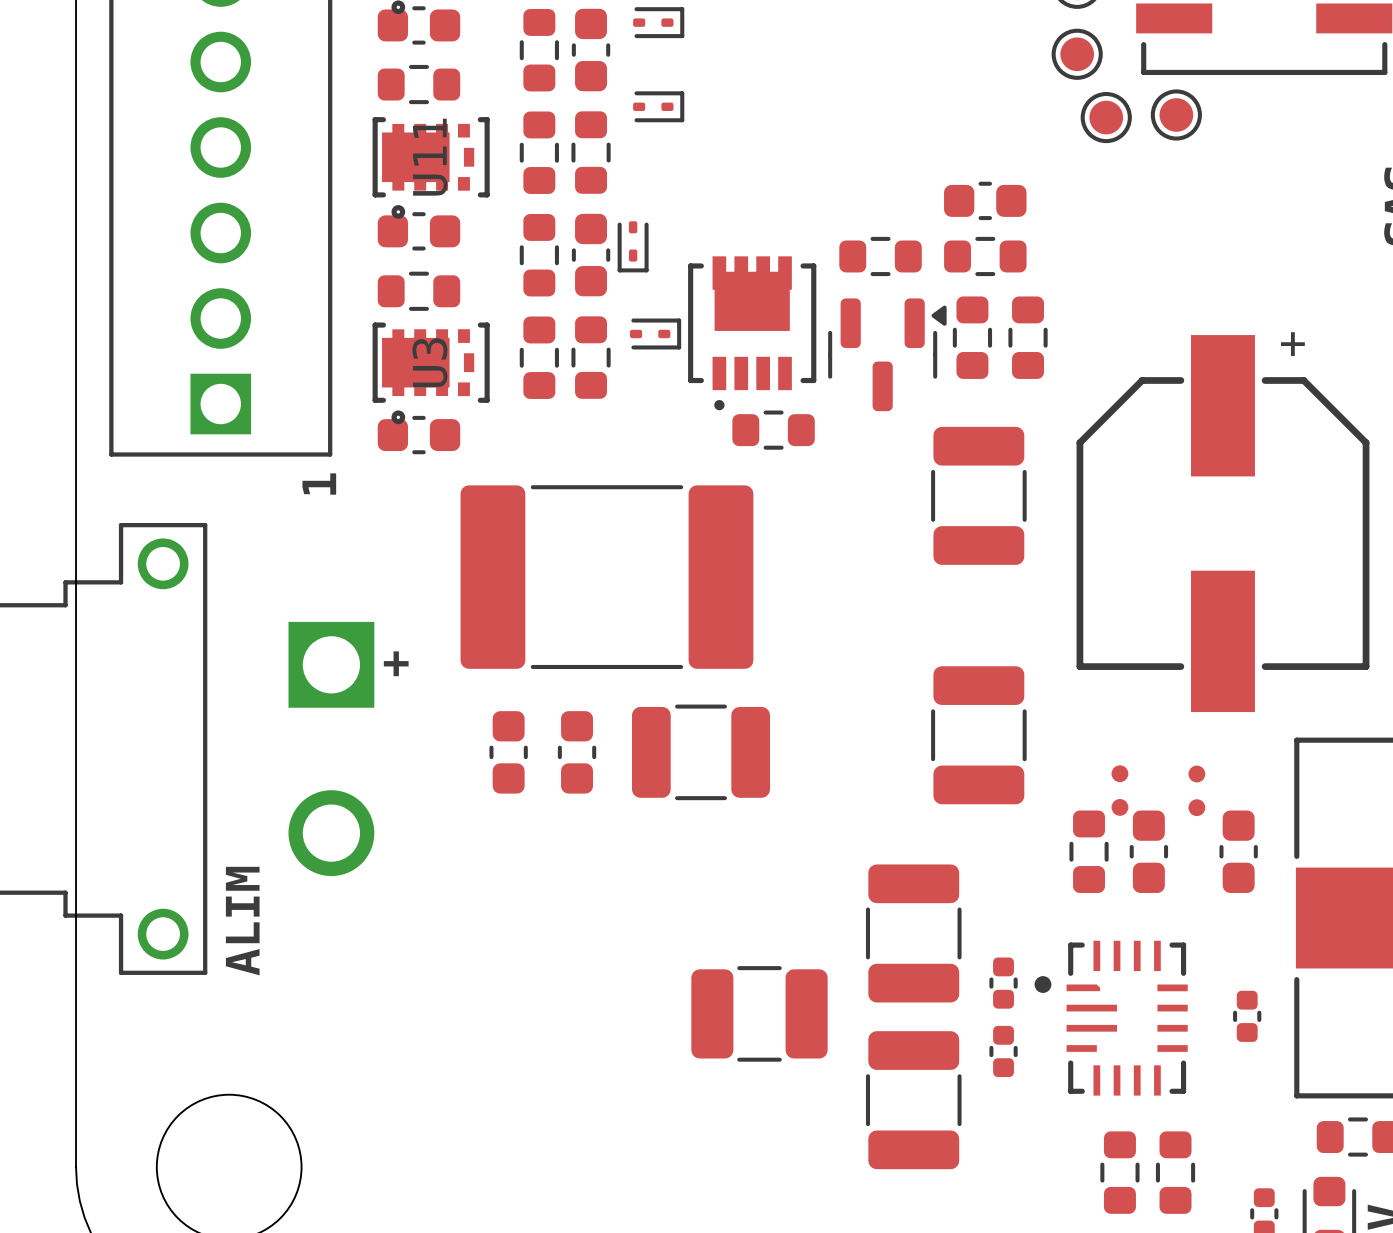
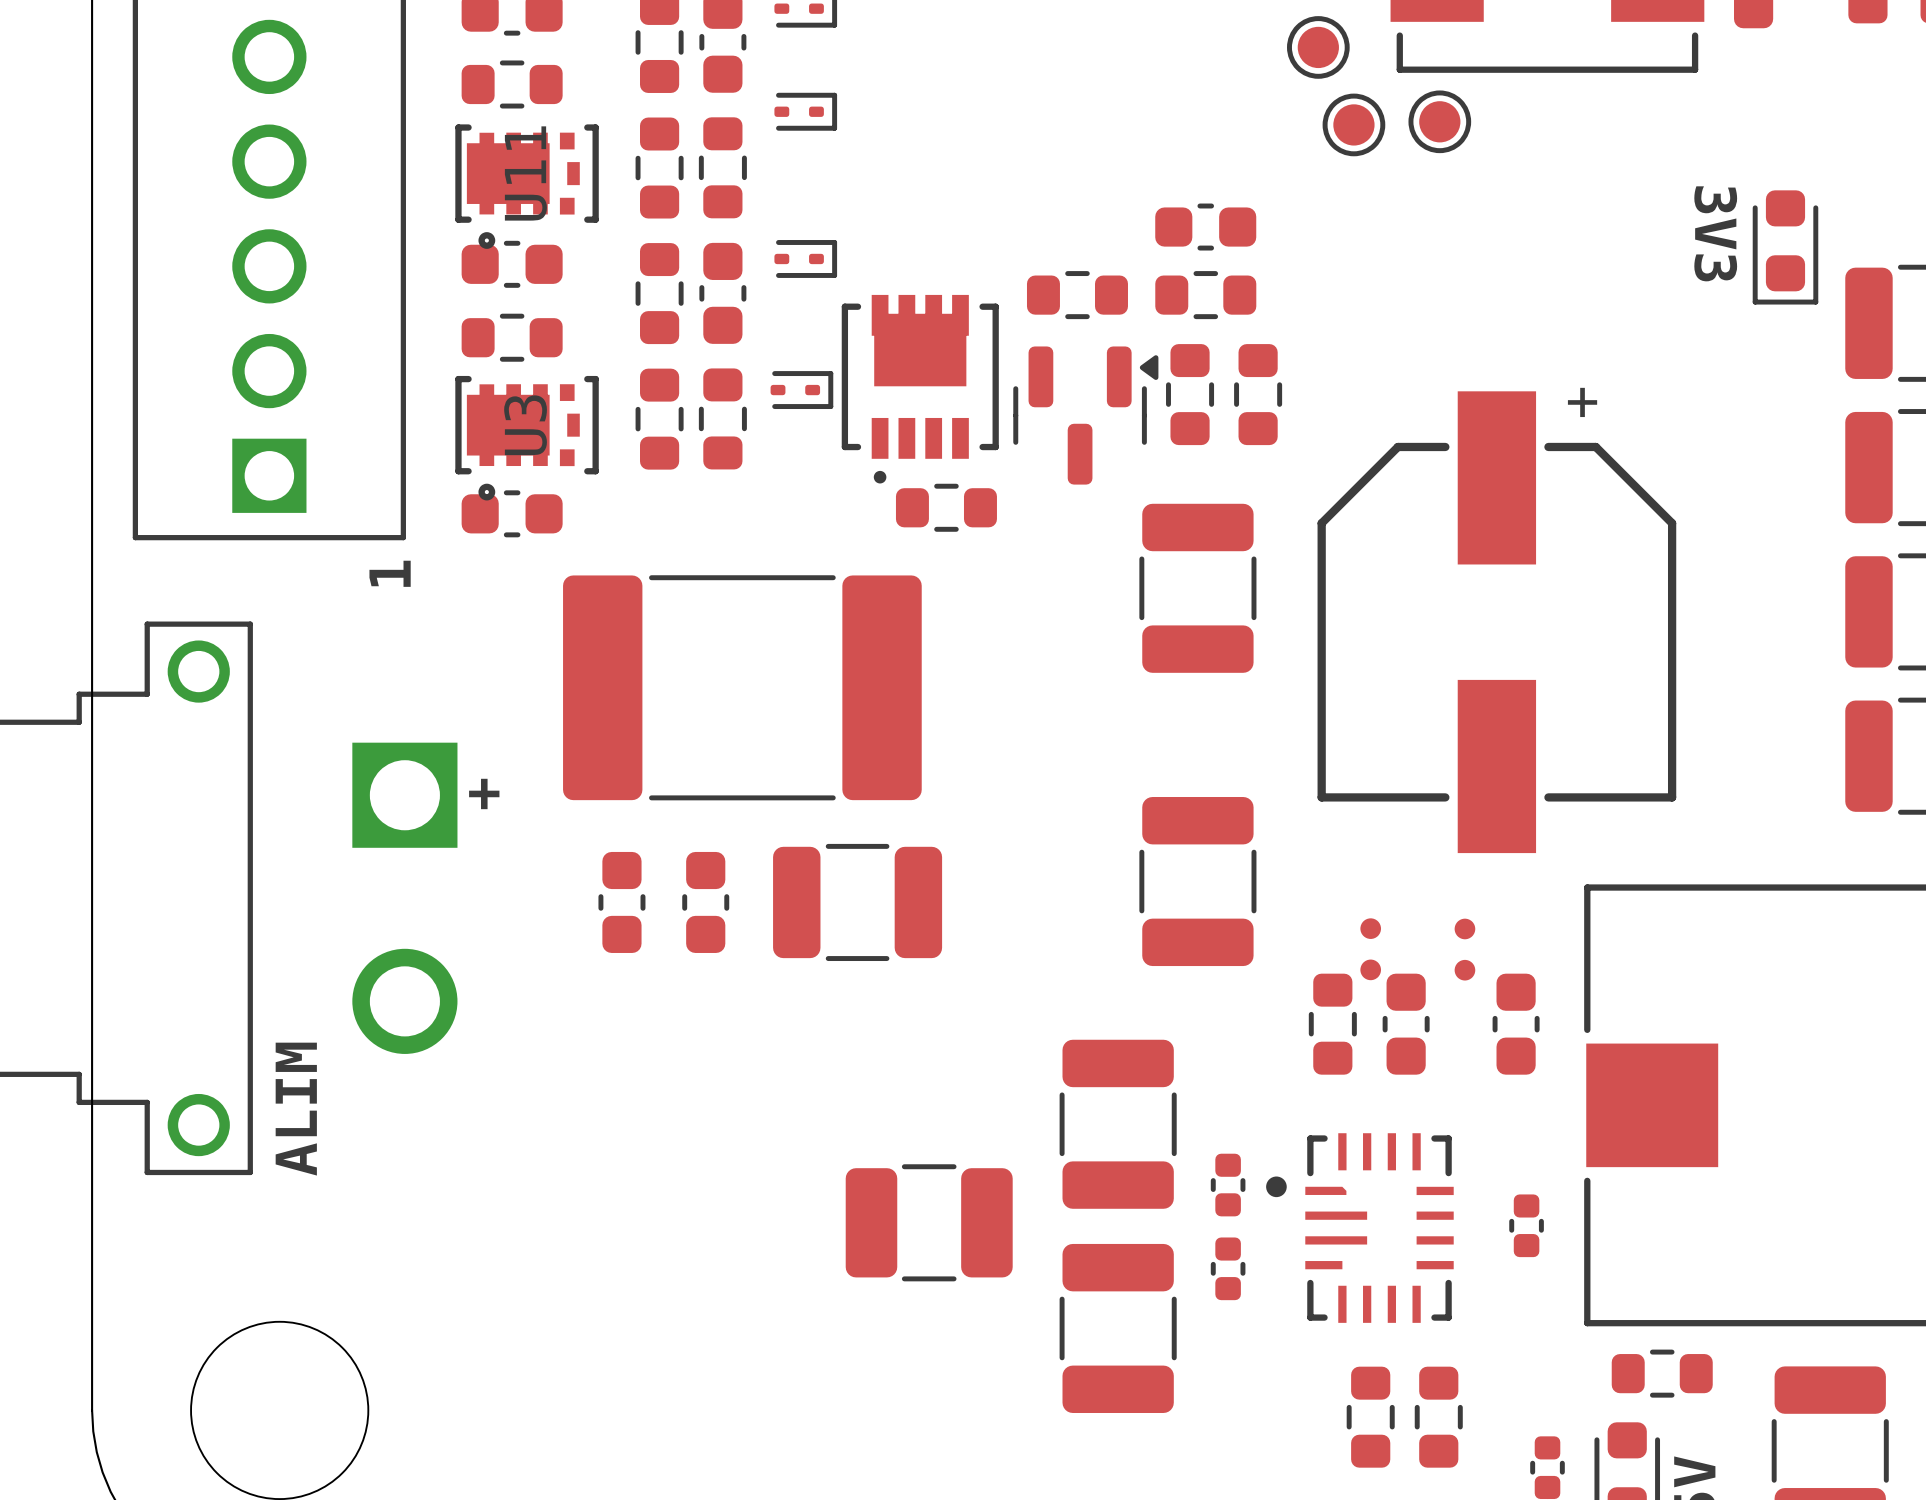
part rotation: 0° (633, 246) -> 90° counterclockwise (805, 258)
part position: (633, 246) -> (805, 258)

